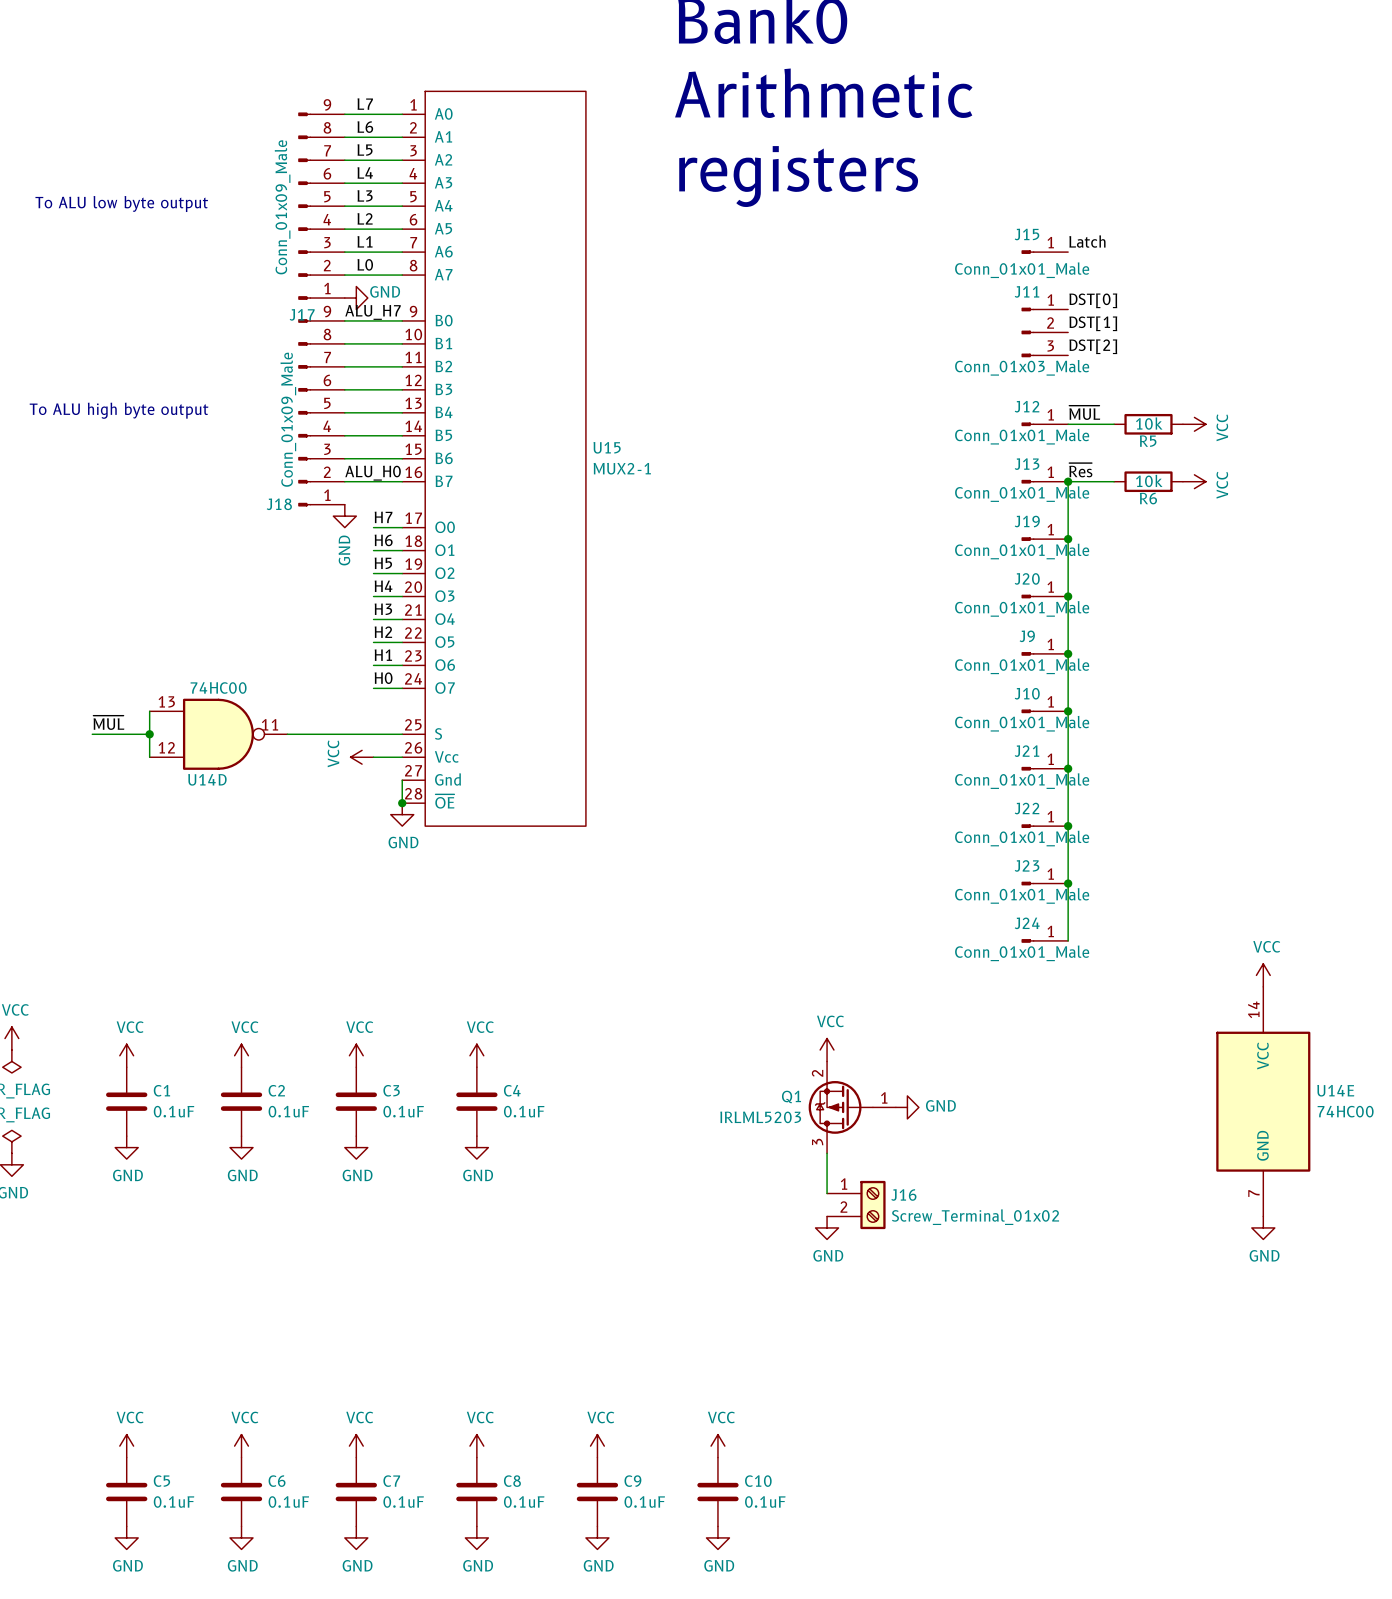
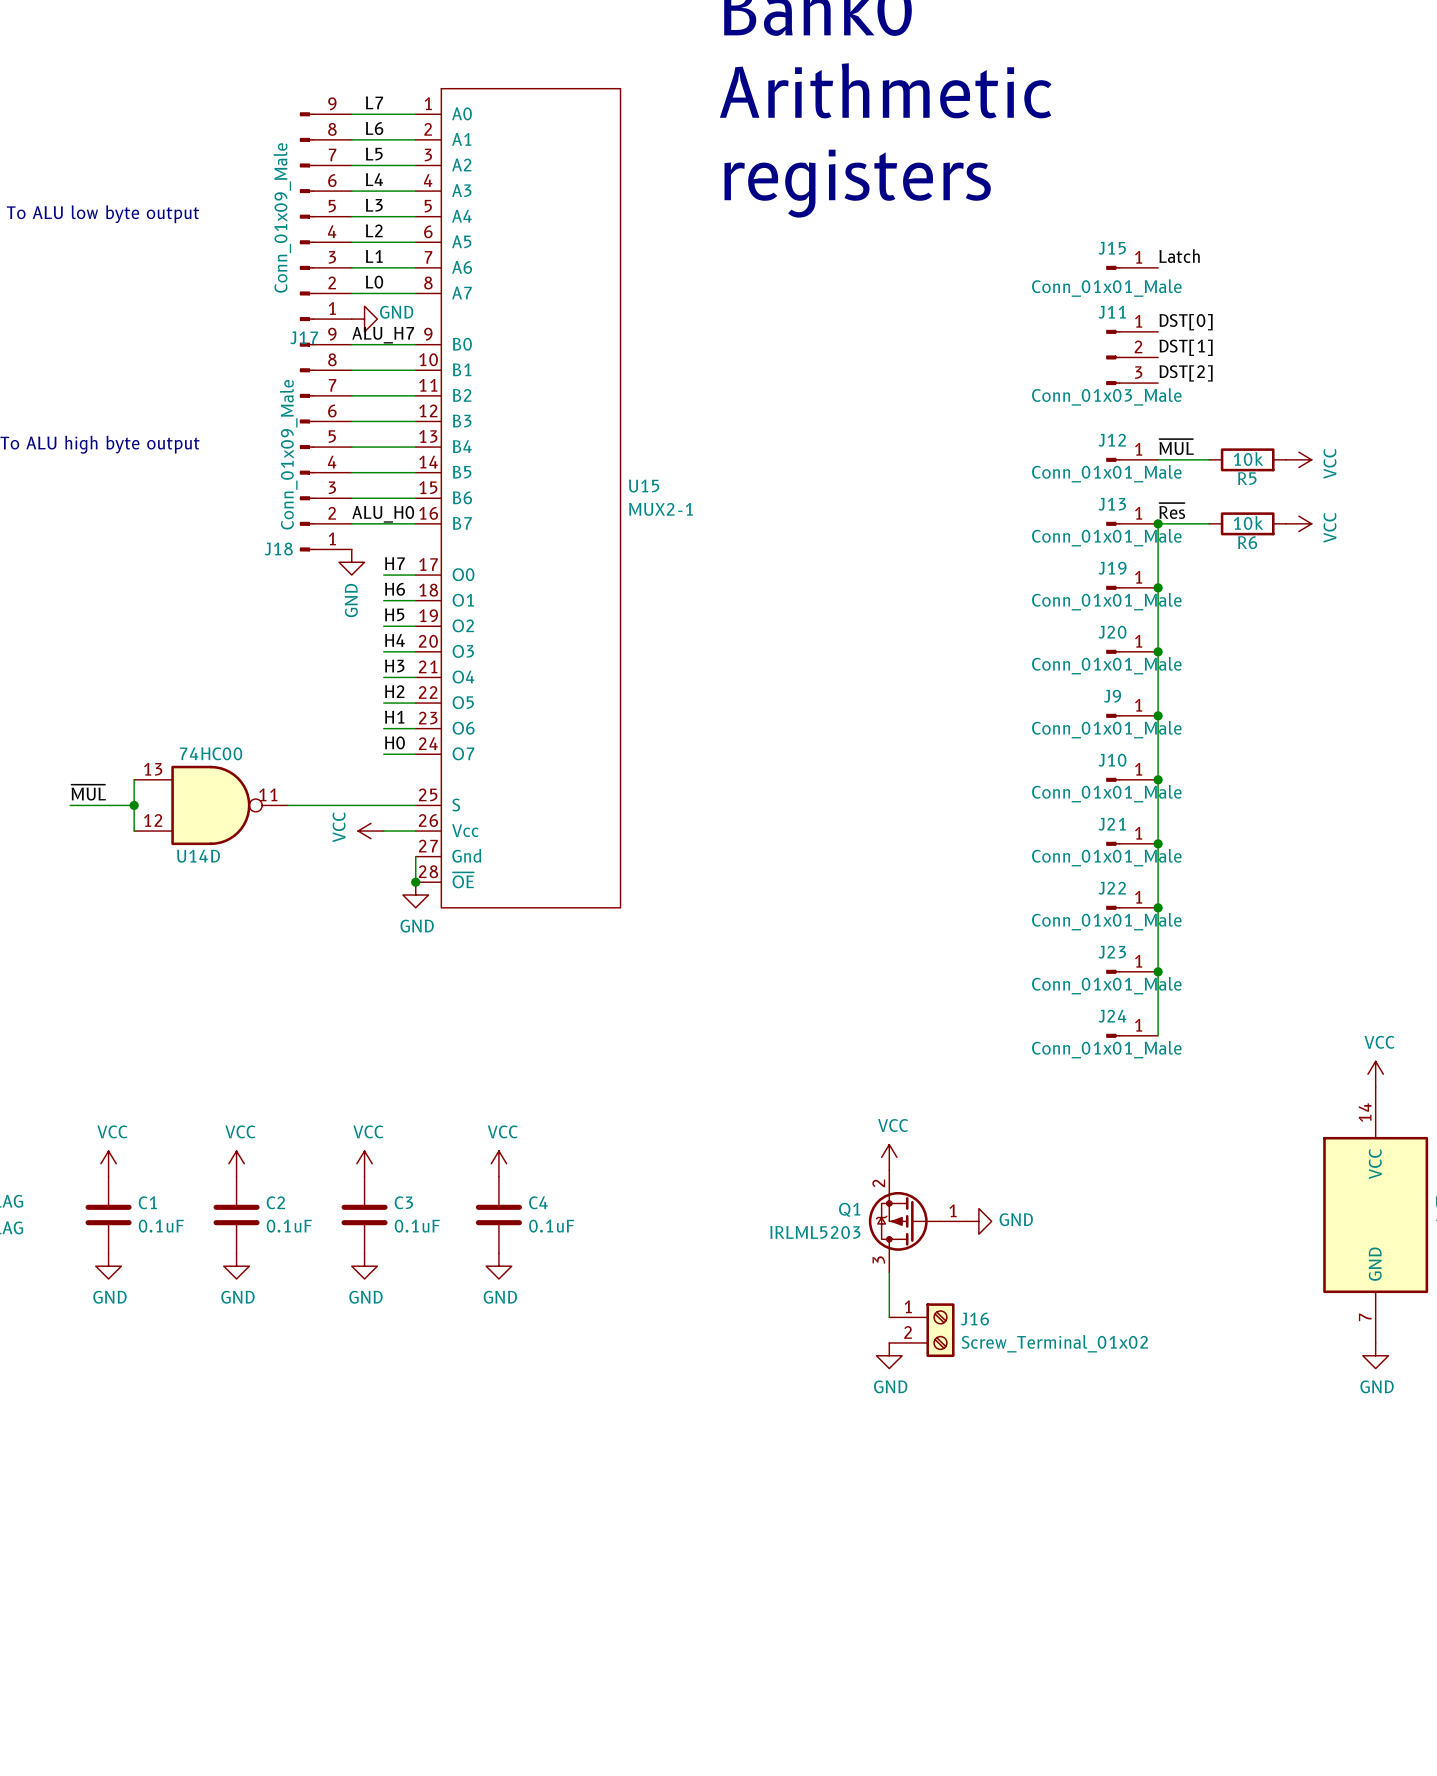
power symbol: VCC (126, 1446) -> none
power symbol: VCC (241, 1446) -> none
power symbol: VCC (356, 1446) -> none
power symbol: VCC (476, 1446) -> none
power symbol: VCC (597, 1446) -> none
power symbol: VCC (717, 1446) -> none
C5: 0.1uF (126, 1492) -> none
C6: 0.1uF (241, 1492) -> none
C7: 0.1uF (356, 1492) -> none
C8: 0.1uF (476, 1492) -> none
C9: 0.1uF (597, 1492) -> none
C10: 0.1uF (717, 1492) -> none
power symbol: GND (126, 1537) -> none
power symbol: GND (241, 1537) -> none
power symbol: GND (356, 1537) -> none
power symbol: GND (476, 1537) -> none
power symbol: GND (597, 1537) -> none
power symbol: GND (717, 1537) -> none

